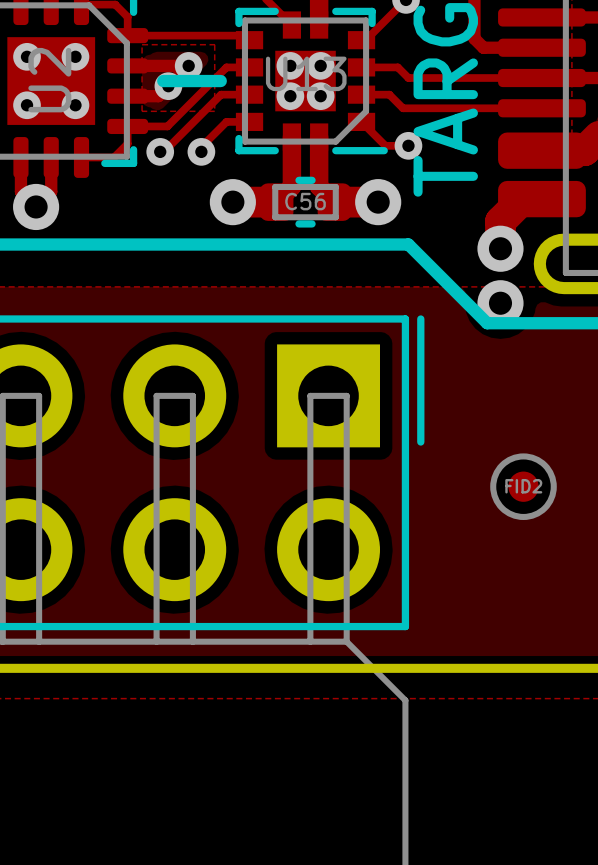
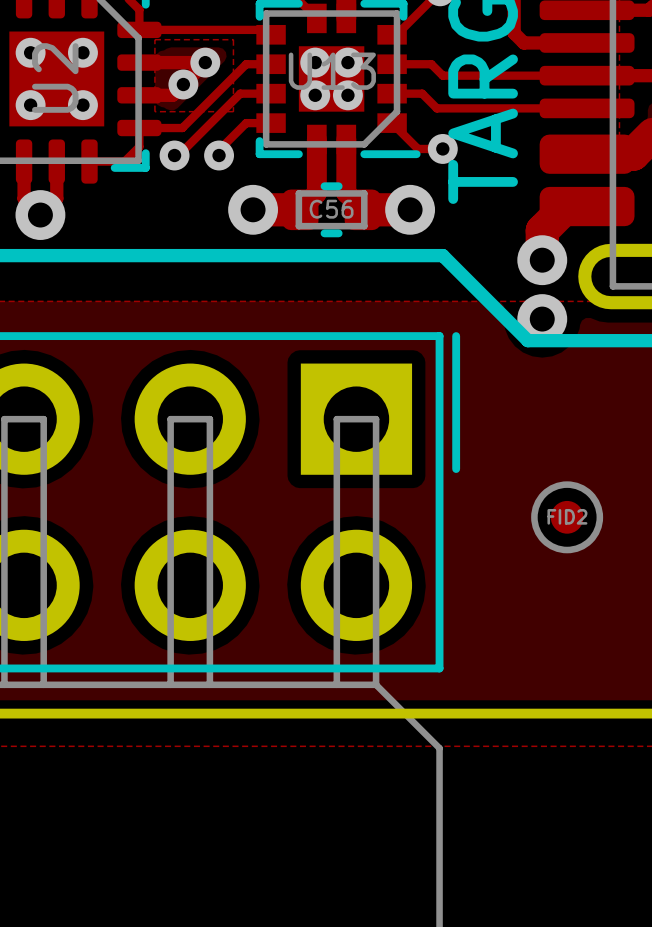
line: (163, 81) (220, 81) -> none

